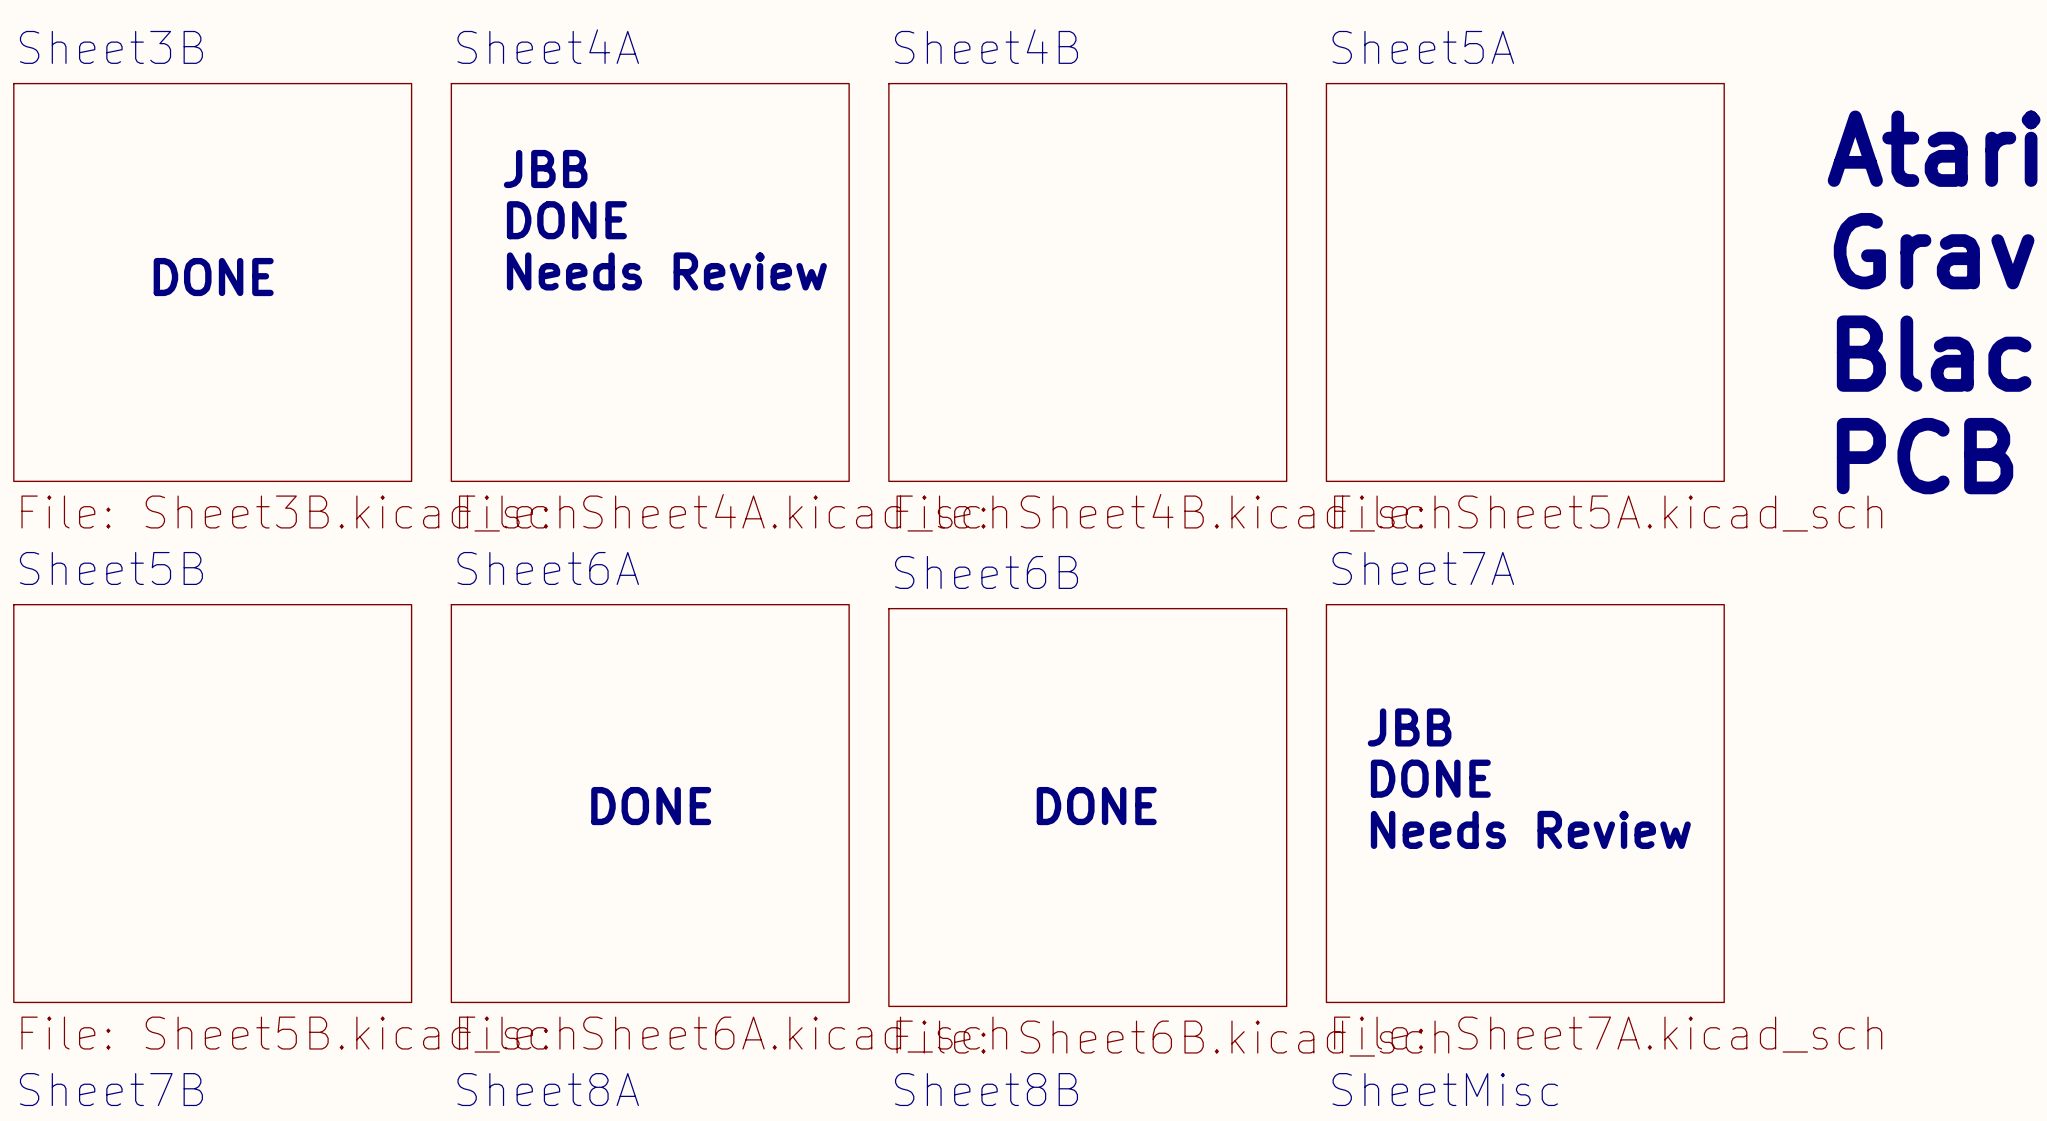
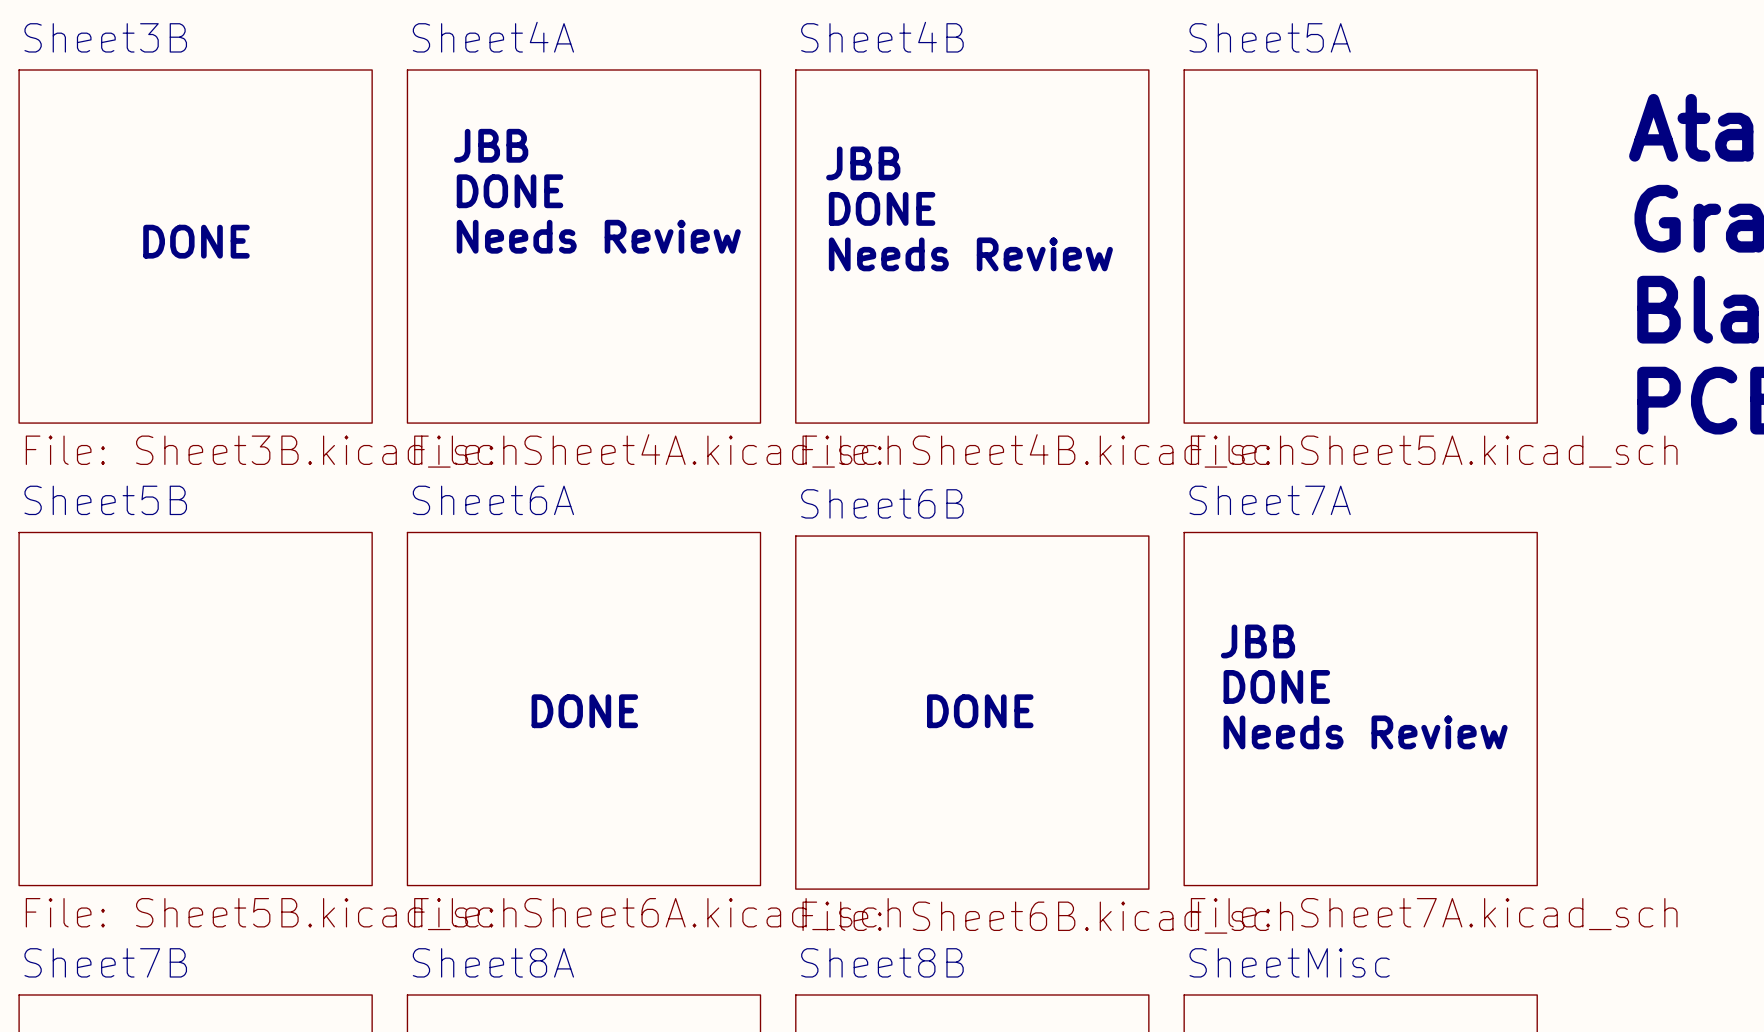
text: none -> JBB (863, 163)
text: none -> DONE (882, 208)
text: none -> Needs Review (970, 254)

